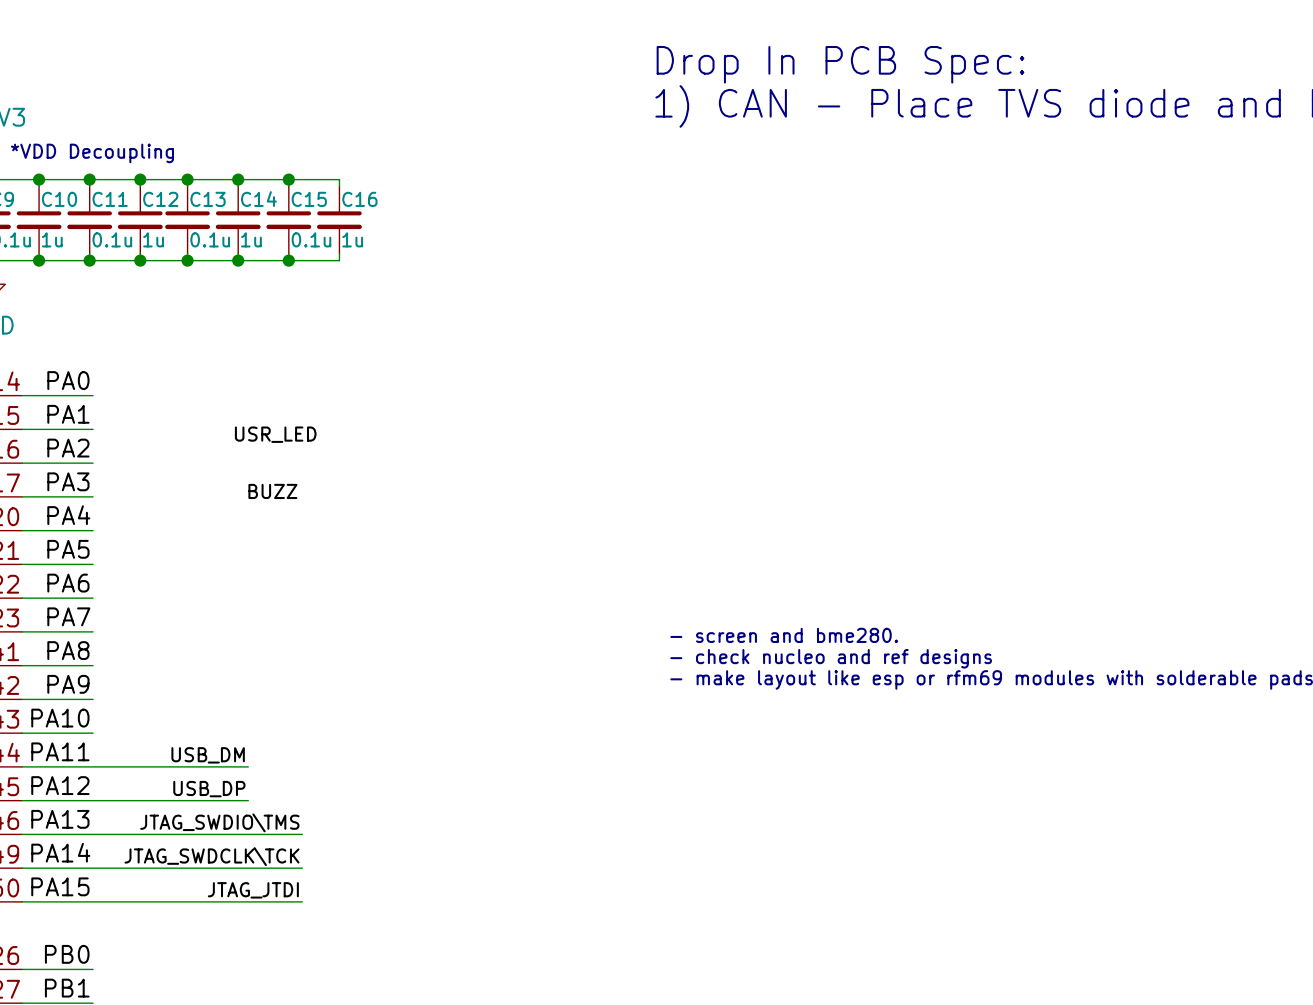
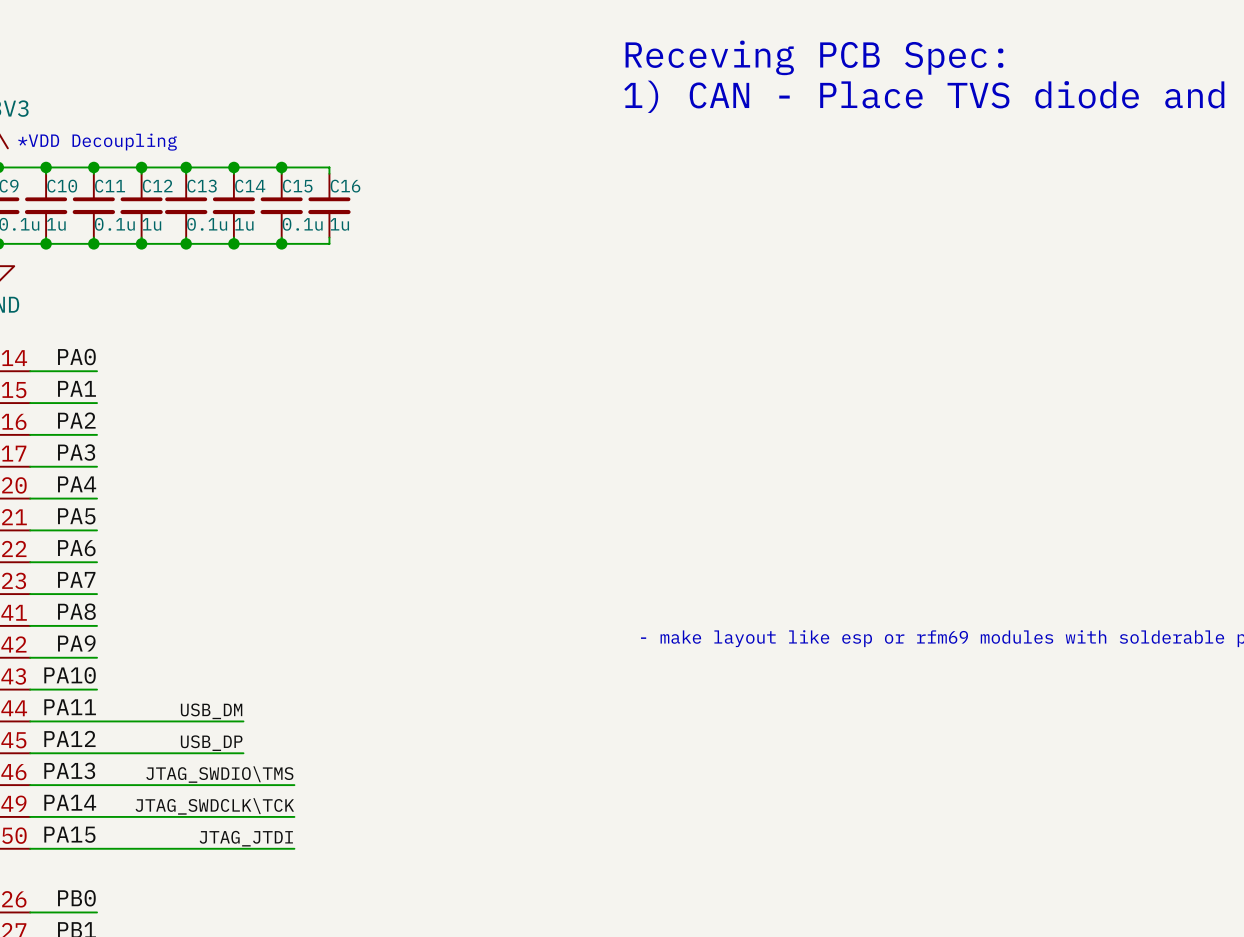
text: Drop In PCB Spec: (840, 64) -> Receving PCB Spec: (814, 57)
label: USR_LED (275, 434) -> none
label: BUZZ (272, 491) -> none
text: - screen and bme280. (784, 635) -> none
text: - check nucleo and ref designs (831, 658) -> none

